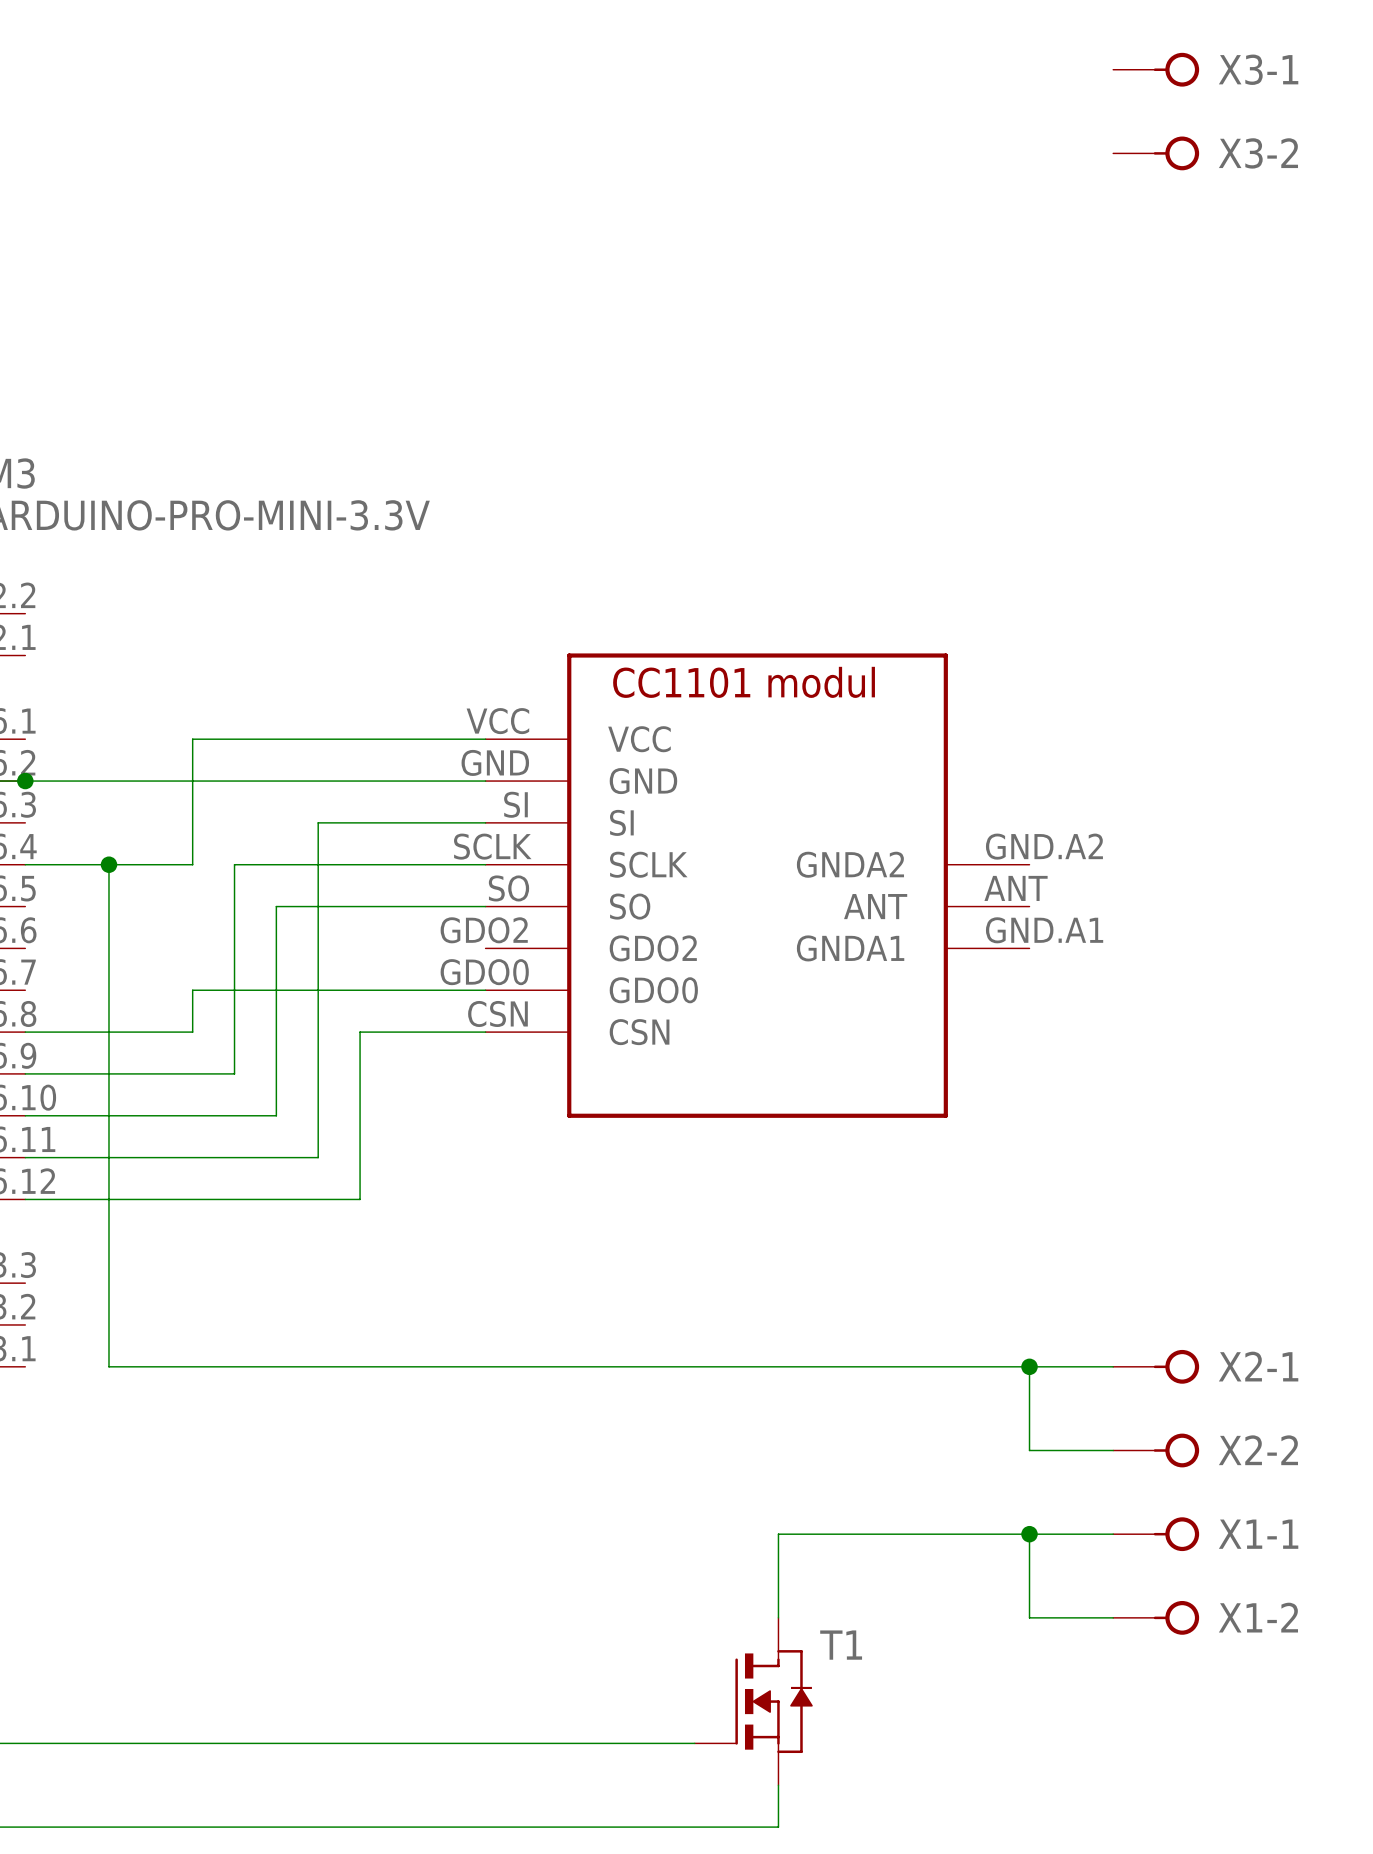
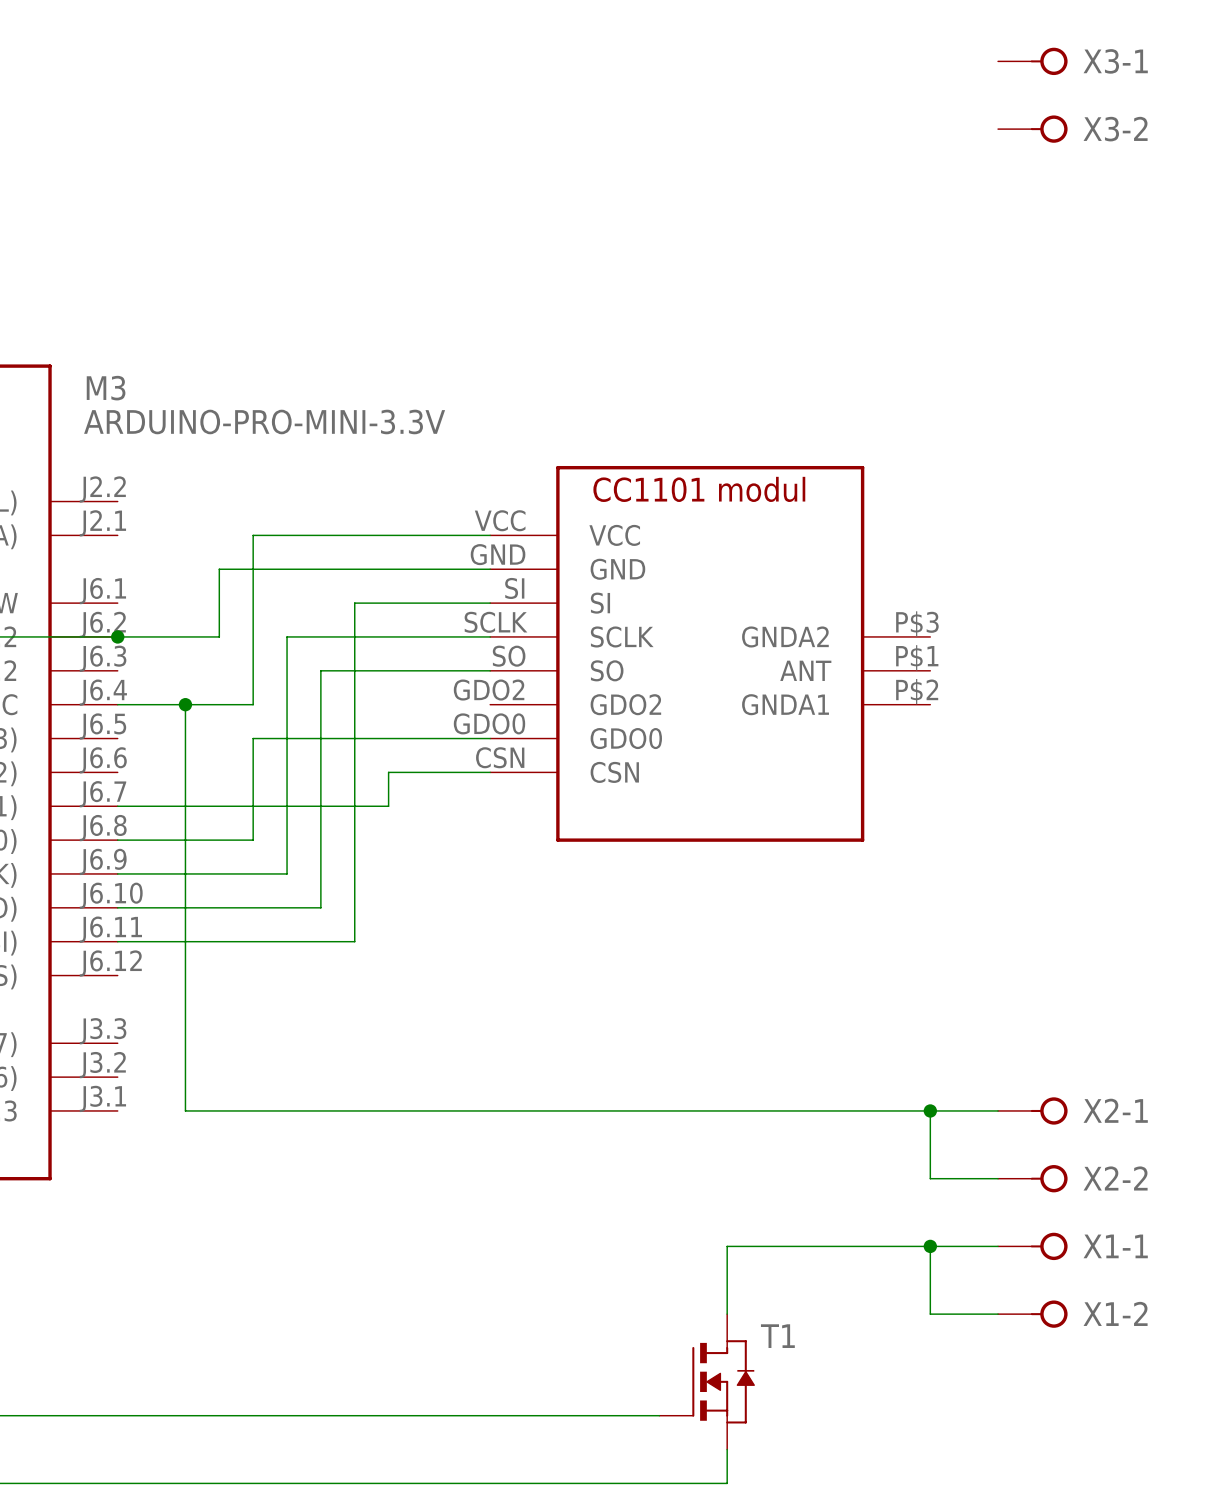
wire: none -> (490, 569) (219, 569) (219, 636)
wire: (192, 739) (318, 739) -> (253, 603) (253, 535) (490, 535)
wire: none -> (354, 603) (354, 670) (320, 670) (320, 738) (253, 738) (253, 806) (117, 806)
wire: (150, 781) (234, 781) -> (287, 704) (287, 636)
part: none -> (710, 653)
wire: (234, 864) (485, 864) -> none
part: (757, 885) -> none
wire: (360, 990) (485, 990) -> (388, 806) (388, 772) (490, 772)
wire: (485, 1032) (360, 1032) (360, 1199) (25, 1199) -> none

